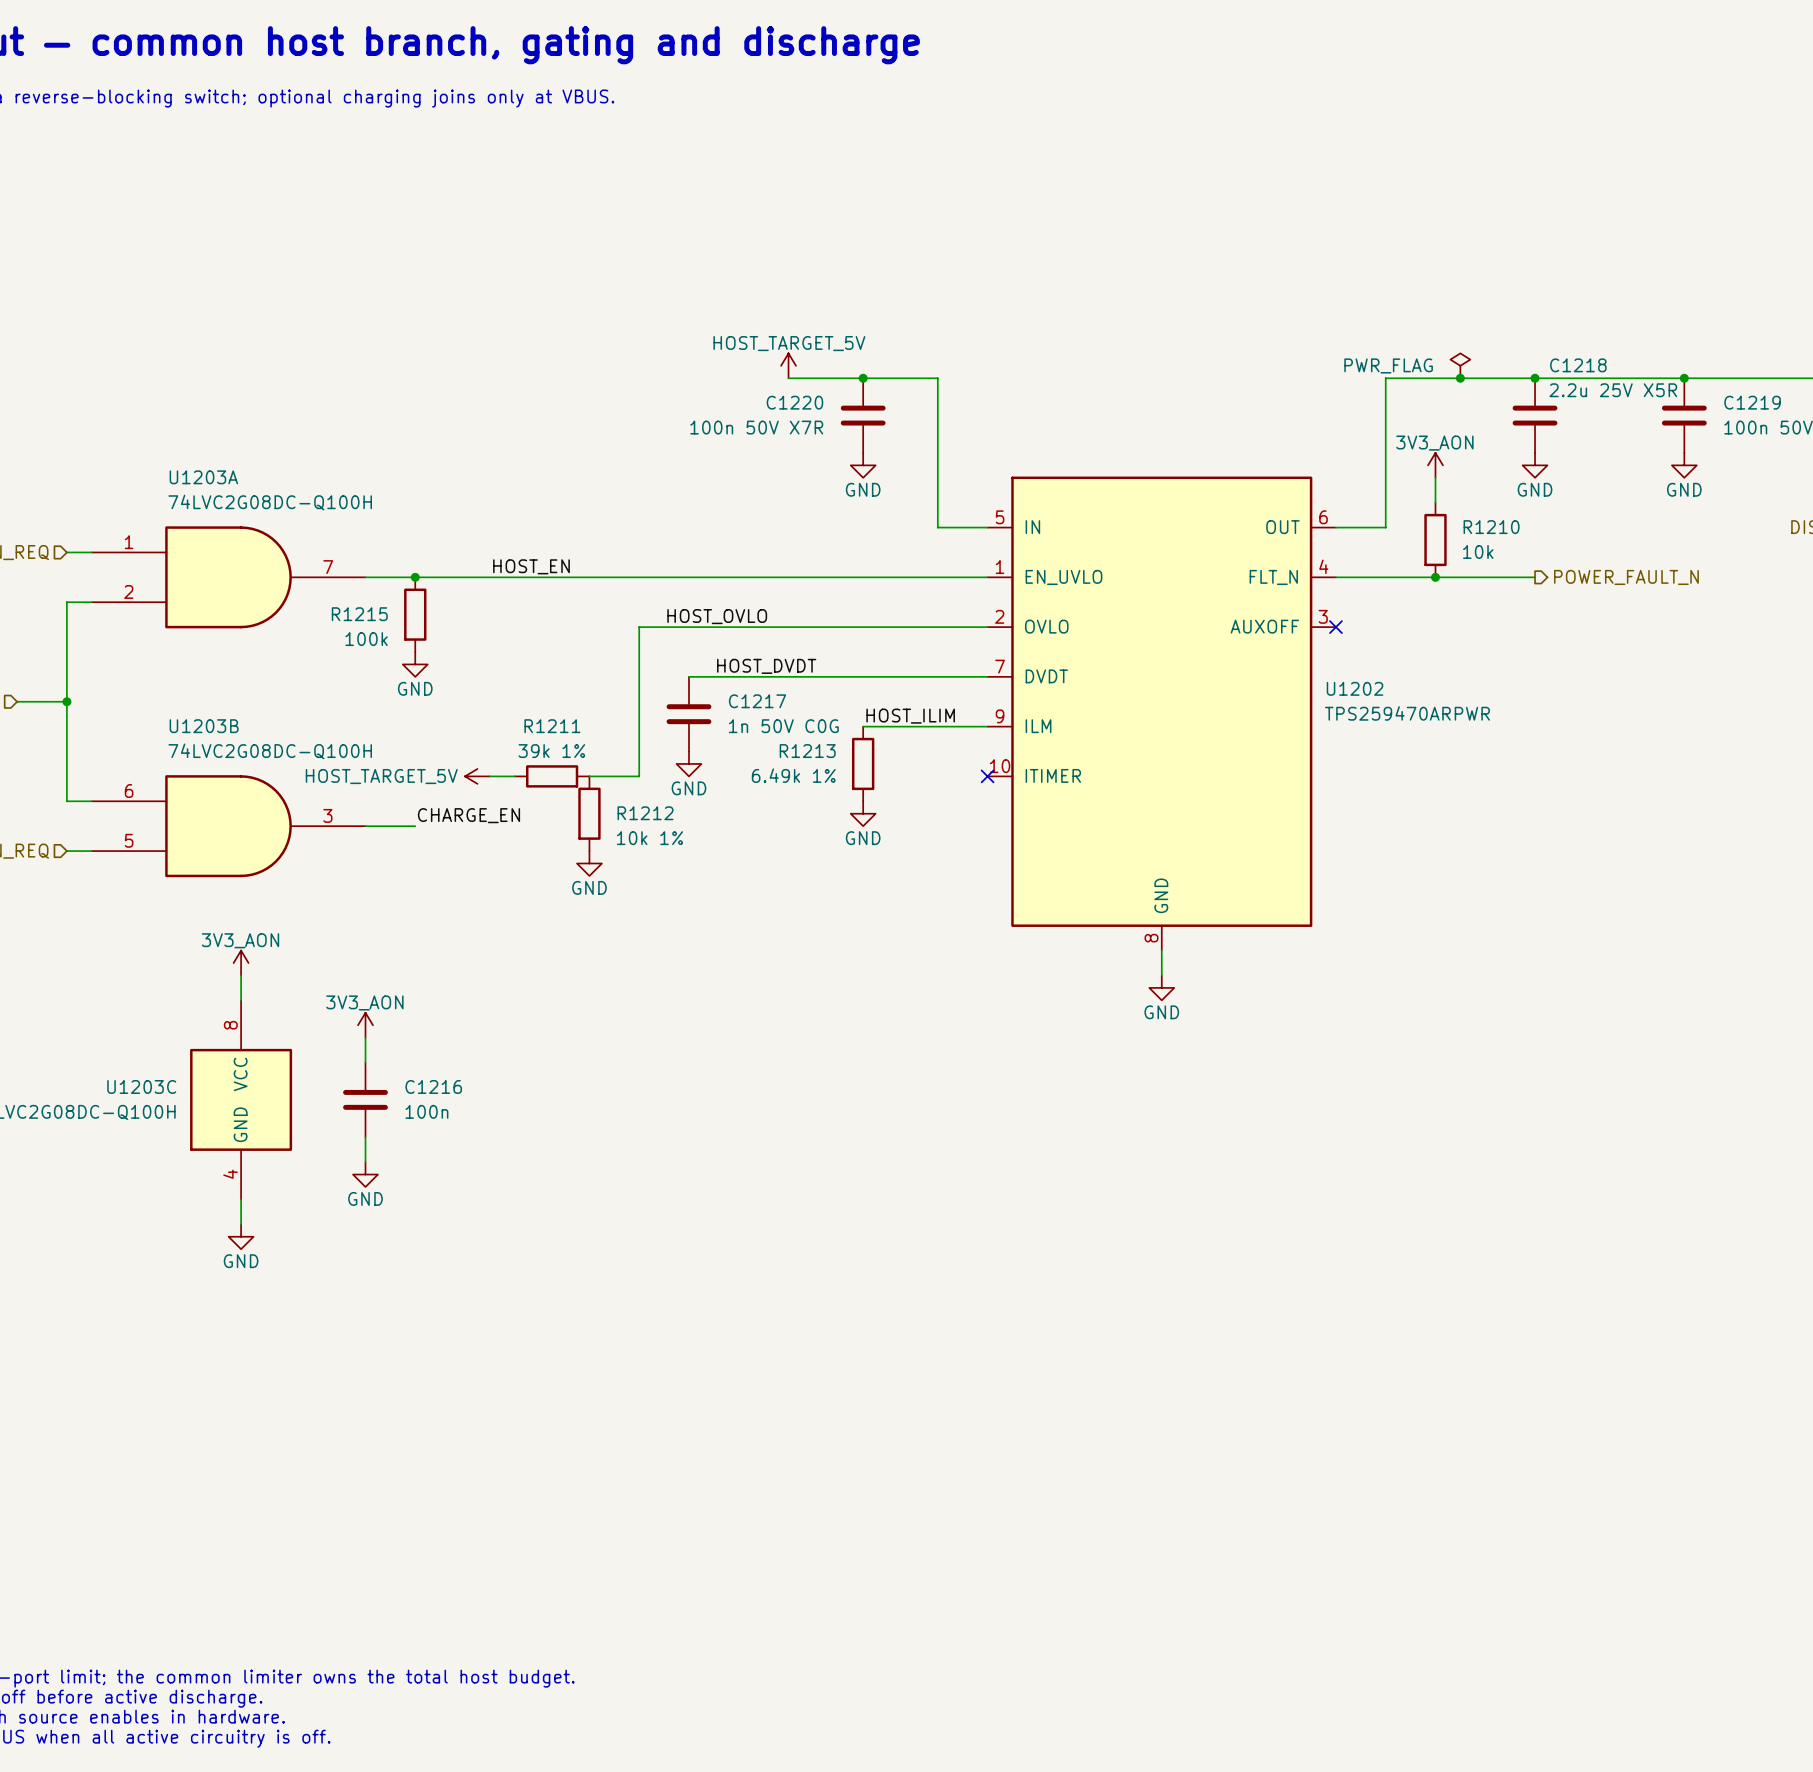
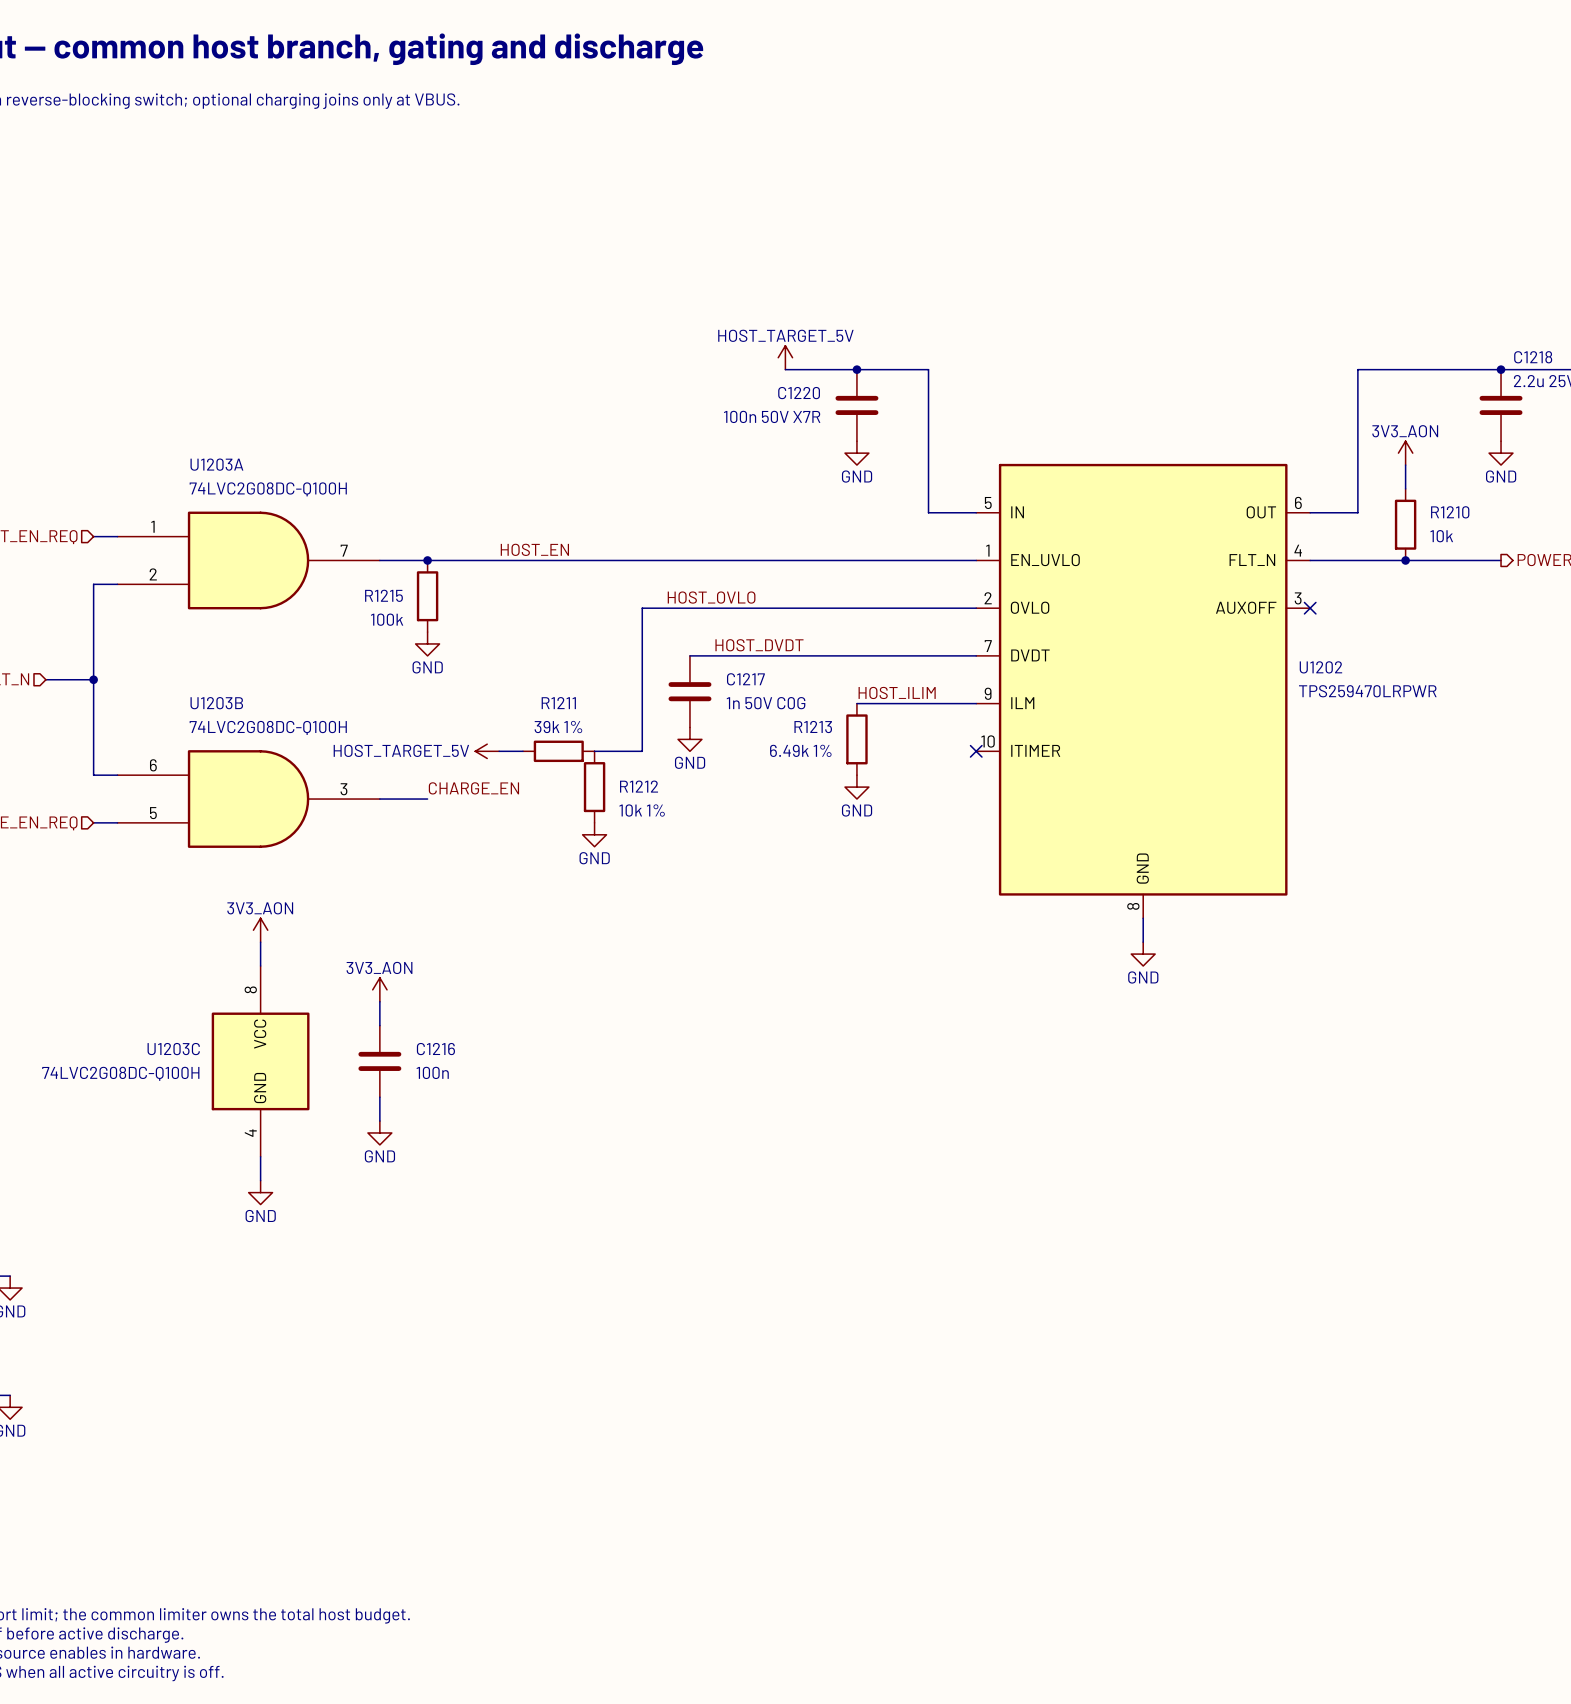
power symbol: PWR_FLAG (1460, 365) -> none
junction: (1460, 378) -> none
U1202 value: TPS259470ARPWR (1407, 713) -> TPS259470LRPWR (1367, 691)

